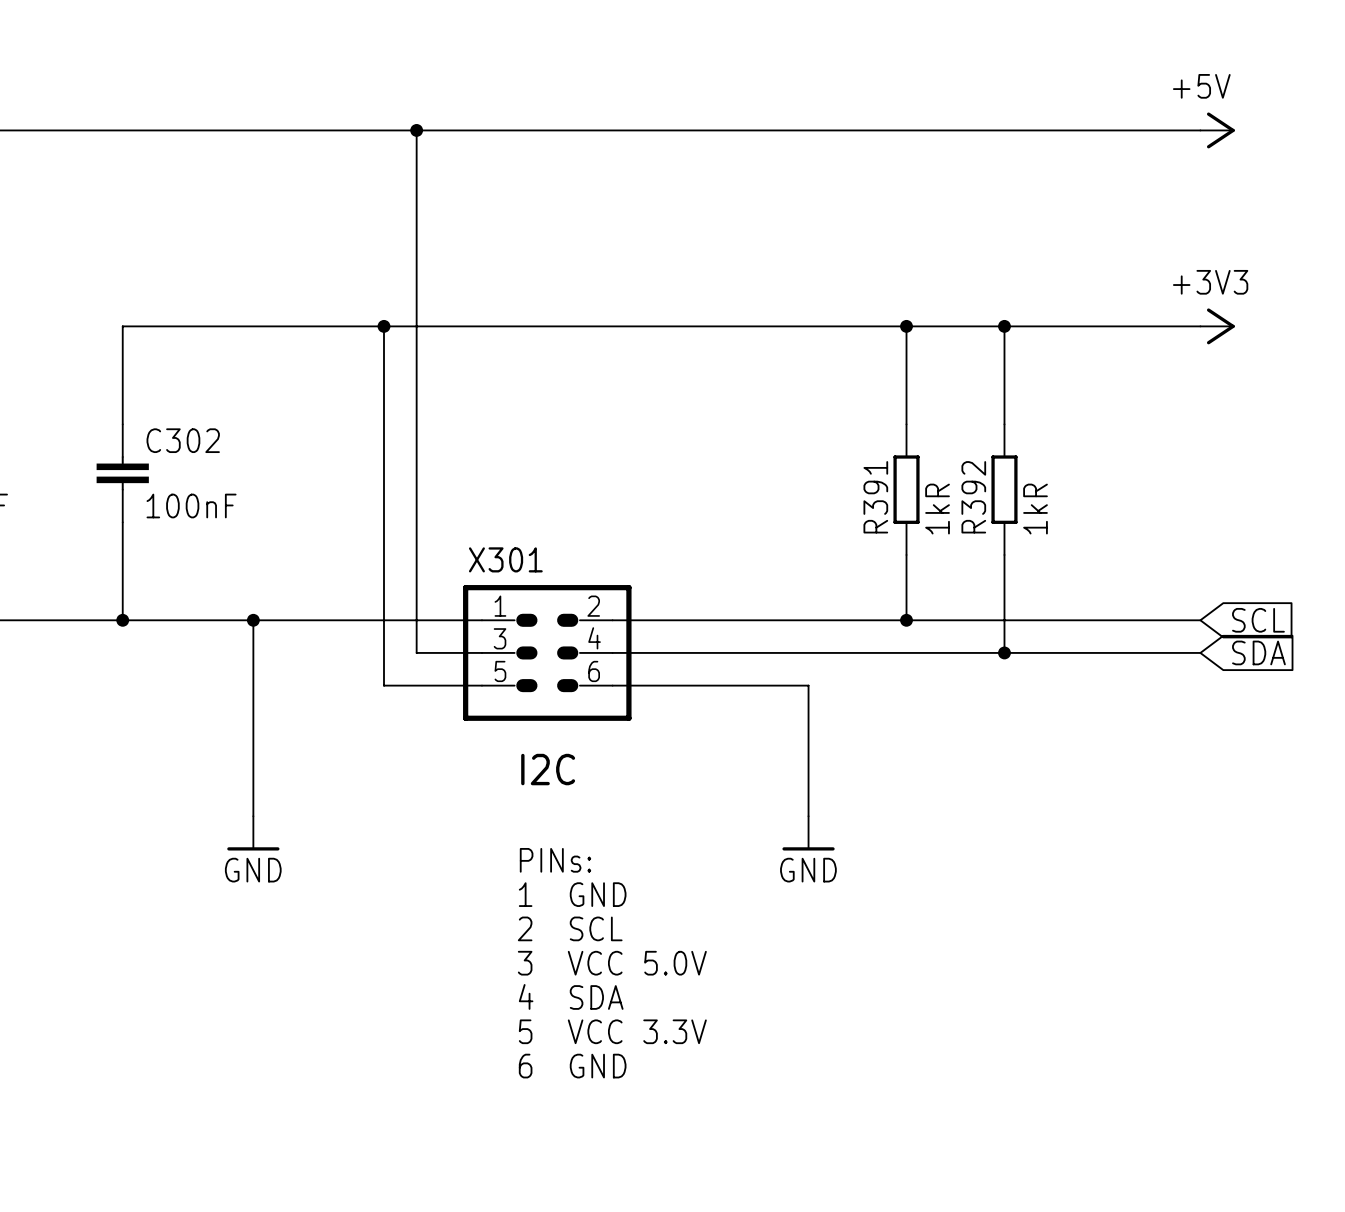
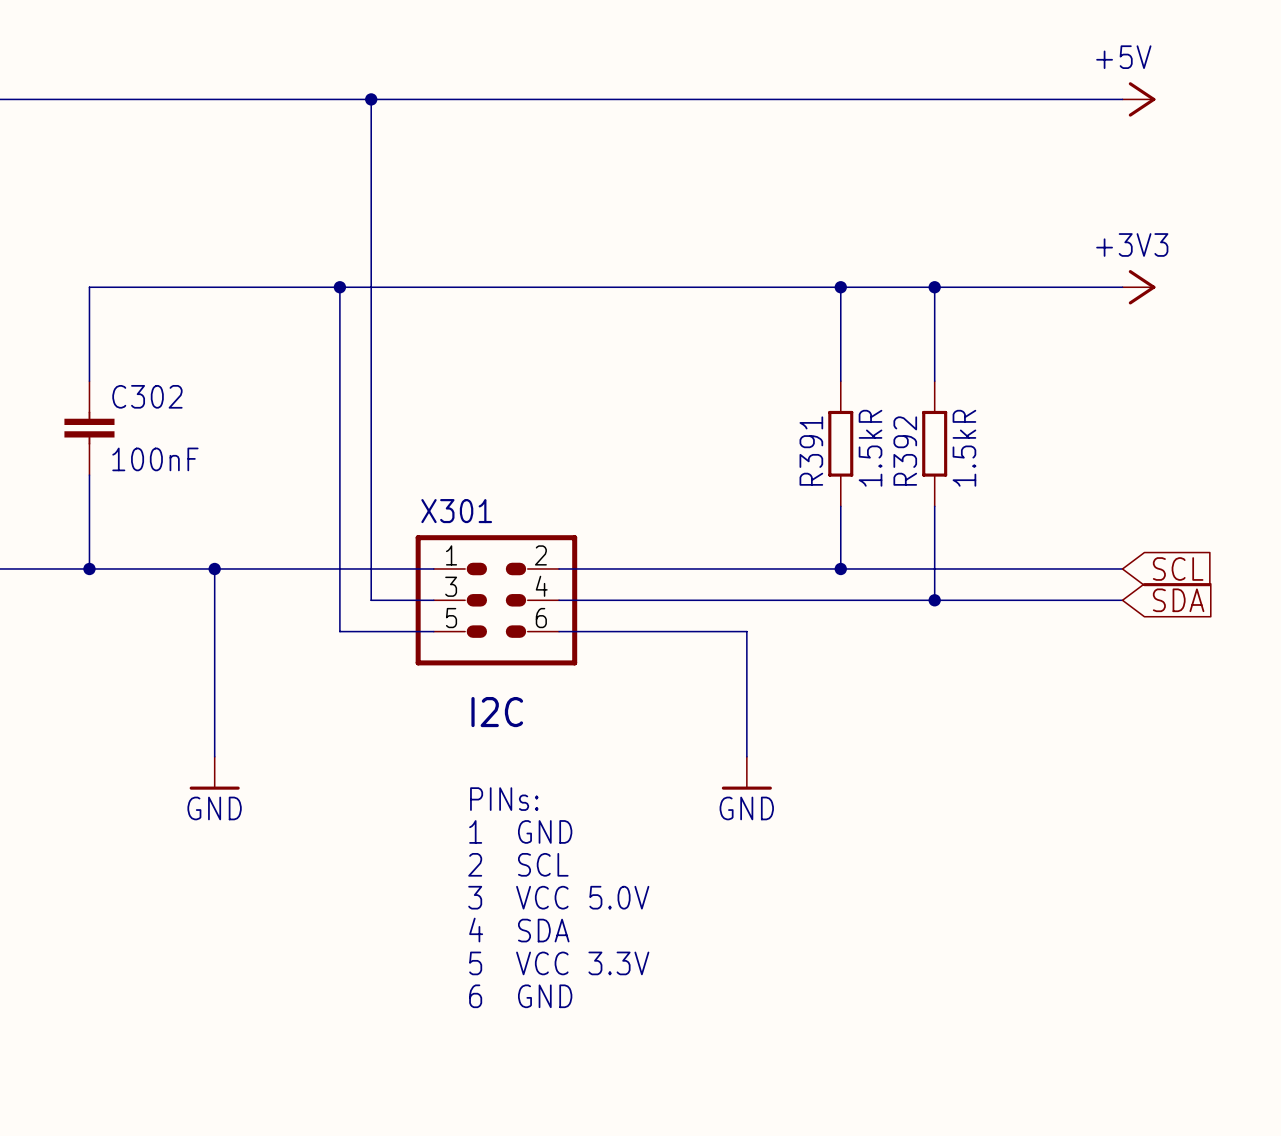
R391 value: 1kR (937, 509) -> 1.5kR (870, 448)
R392 value: 1kR (1035, 509) -> 1.5kR (964, 448)

